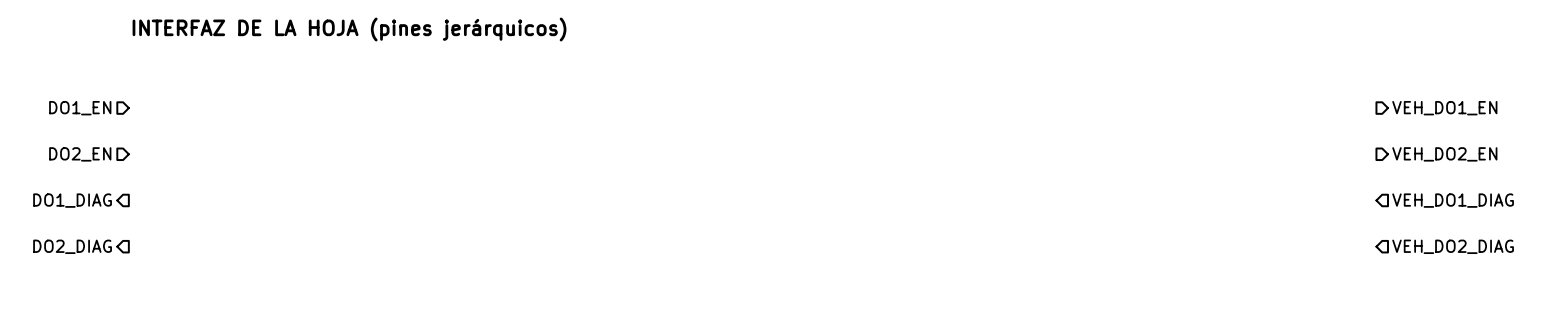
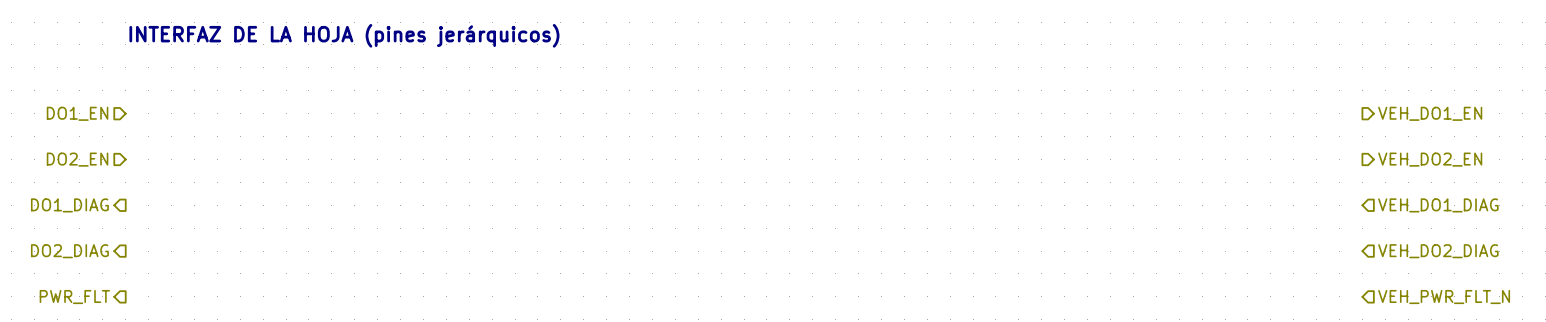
hierarchical label: none -> PWR_FLT (74, 297)
hierarchical label: none -> VEH_PWR_FLT_N (1444, 297)

